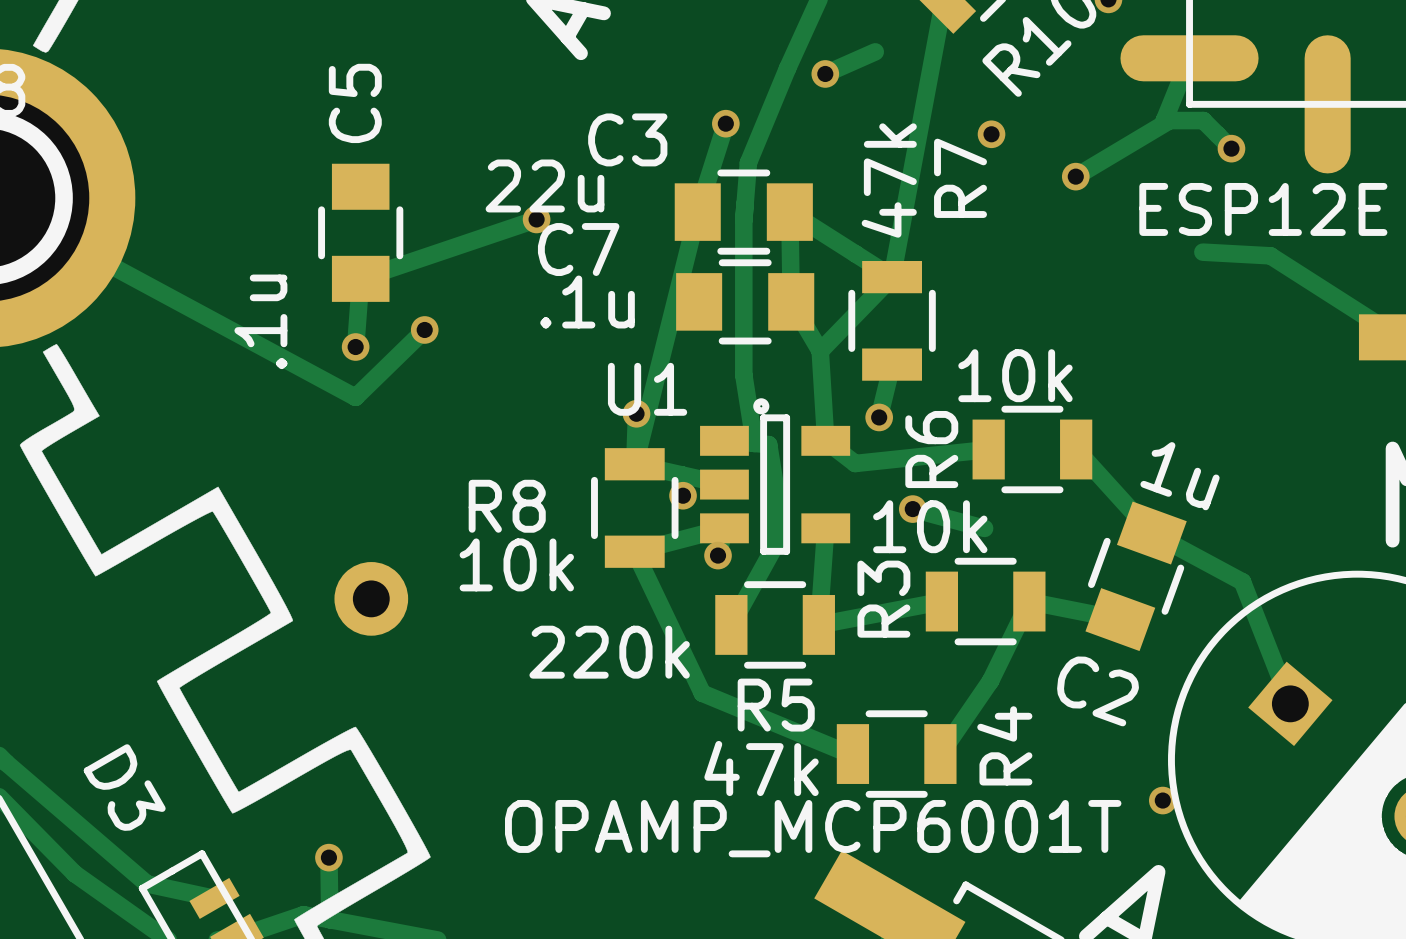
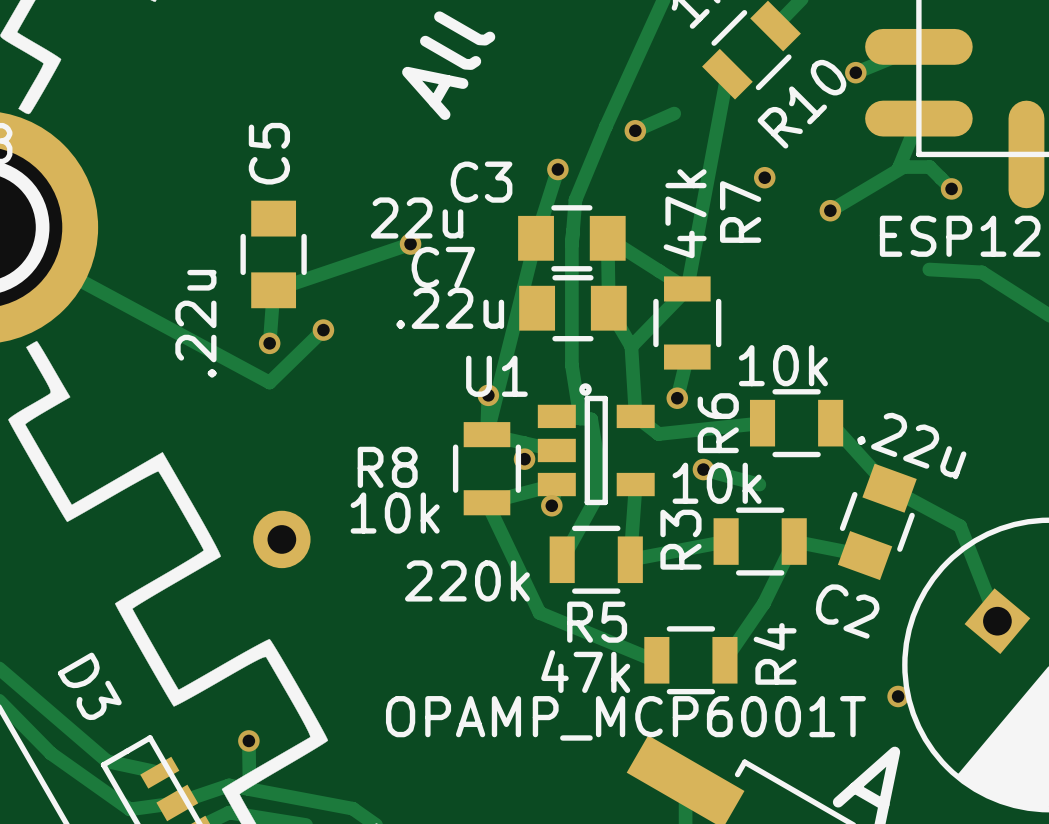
C7 value: .1u (587, 302) -> .22u (450, 308)
C5 value: .1u (260, 321) -> .22u (195, 323)
C2 value: 1u (1180, 476) -> .22u (911, 445)

